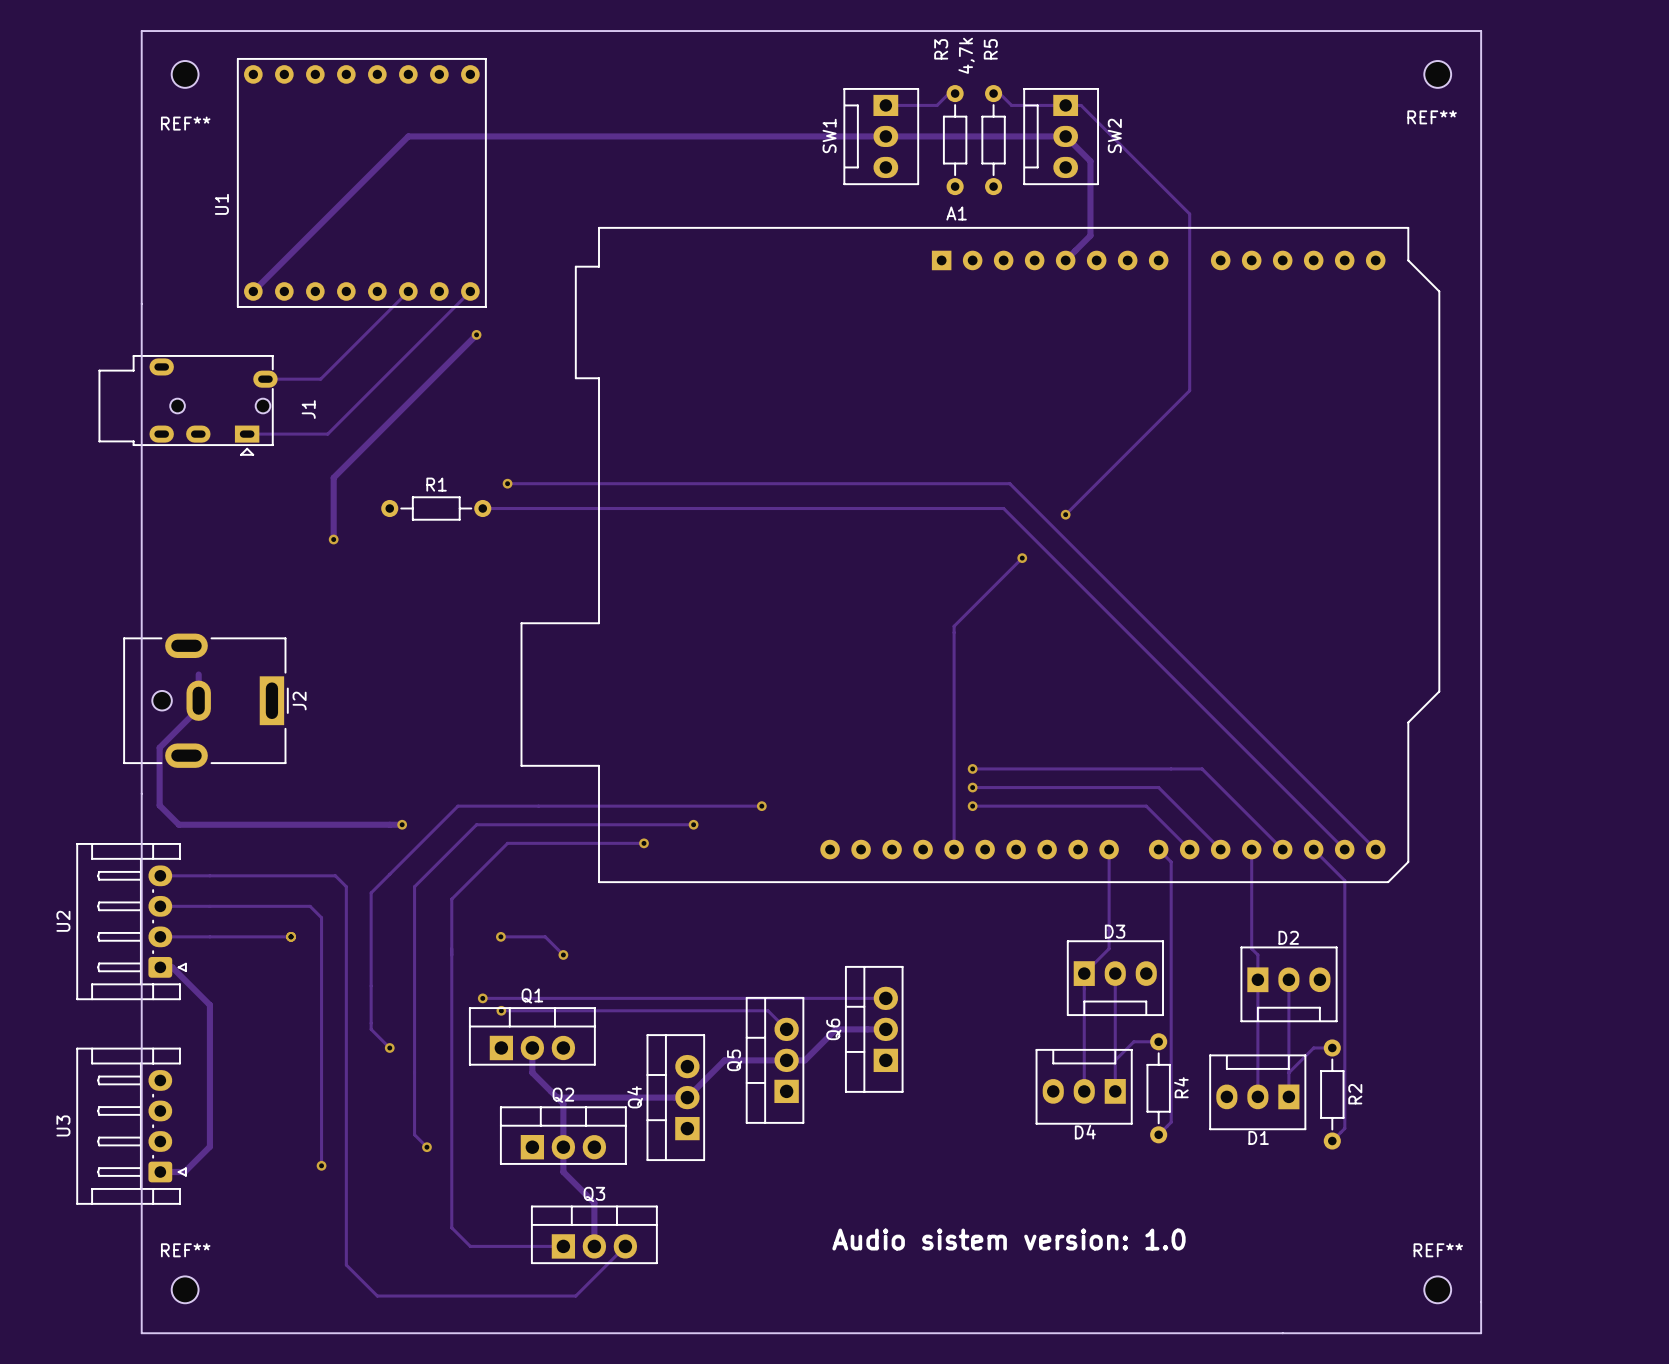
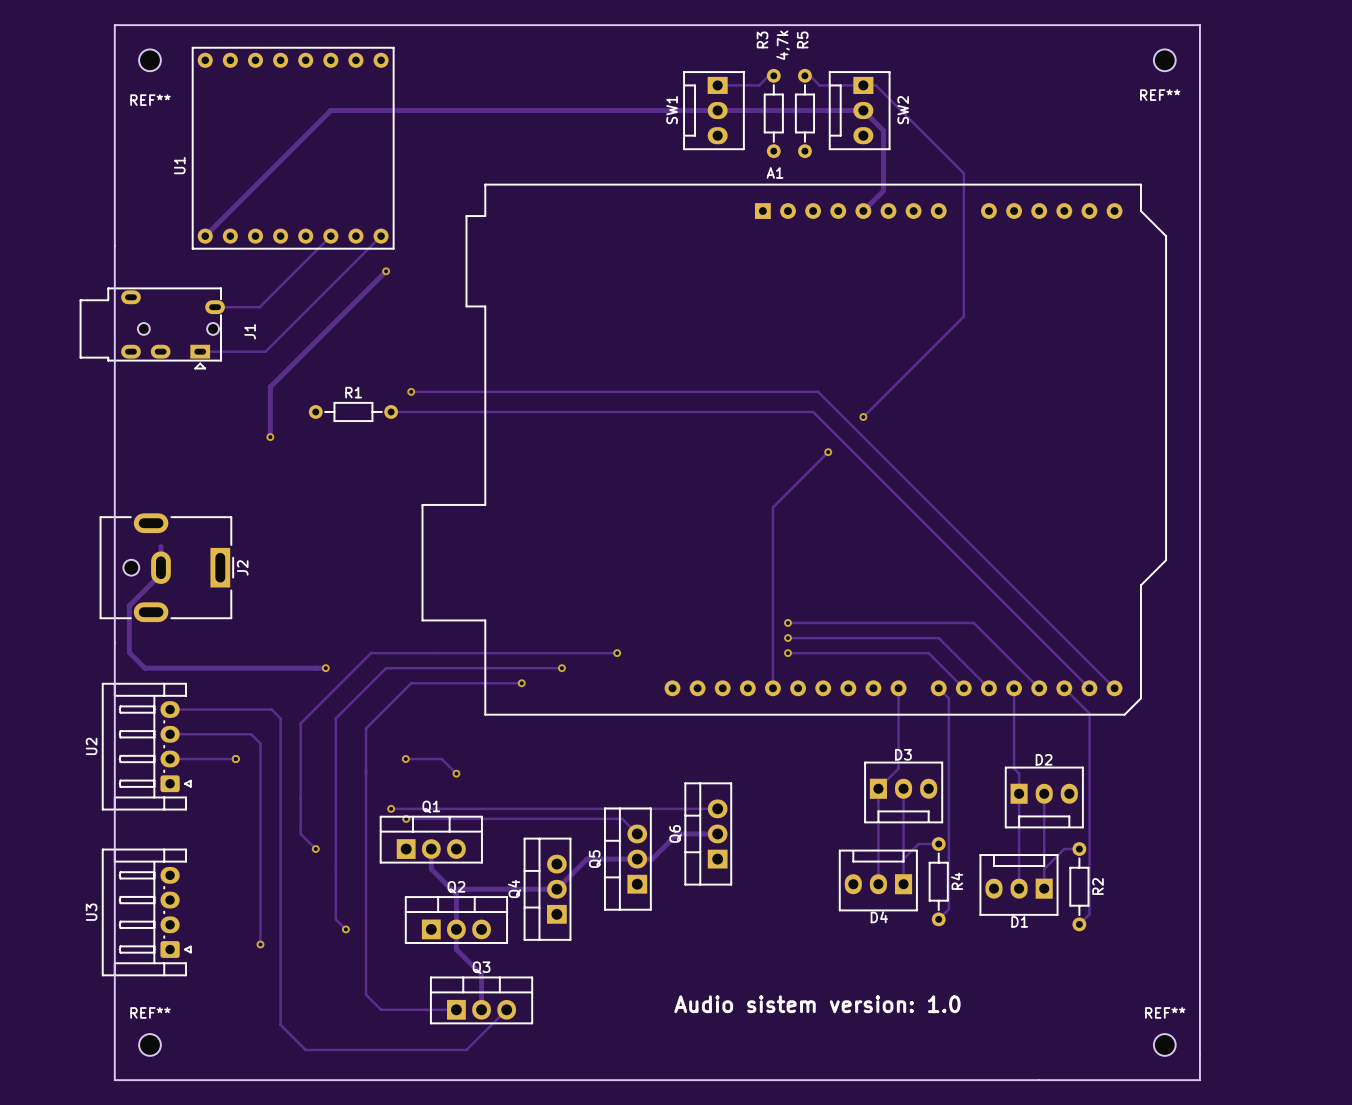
track: (160, 875) (209, 875) -> none
track: (160, 906) (209, 906) -> none
U2 position: (131, 921) -> (146, 746)
track: (160, 936) (209, 936) -> none
track: (160, 967) (172, 967) (209, 1005) (209, 1146) (184, 1172) (160, 1172) -> none
U3 position: (131, 1126) -> (146, 912)

